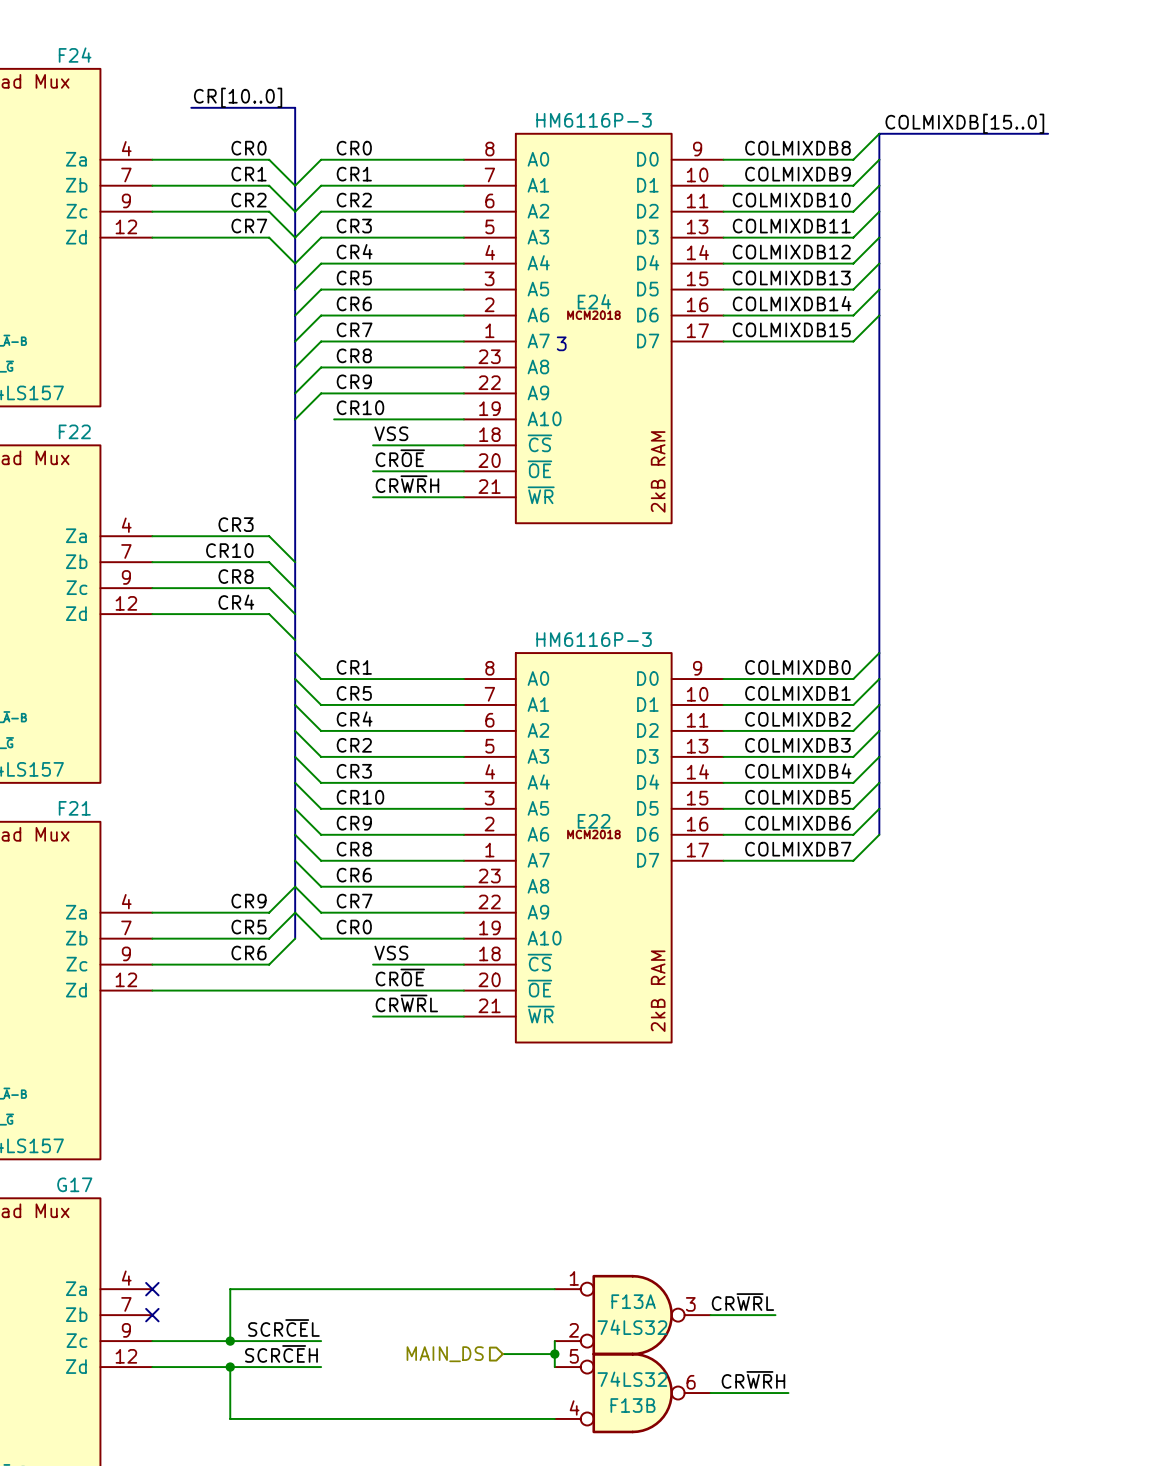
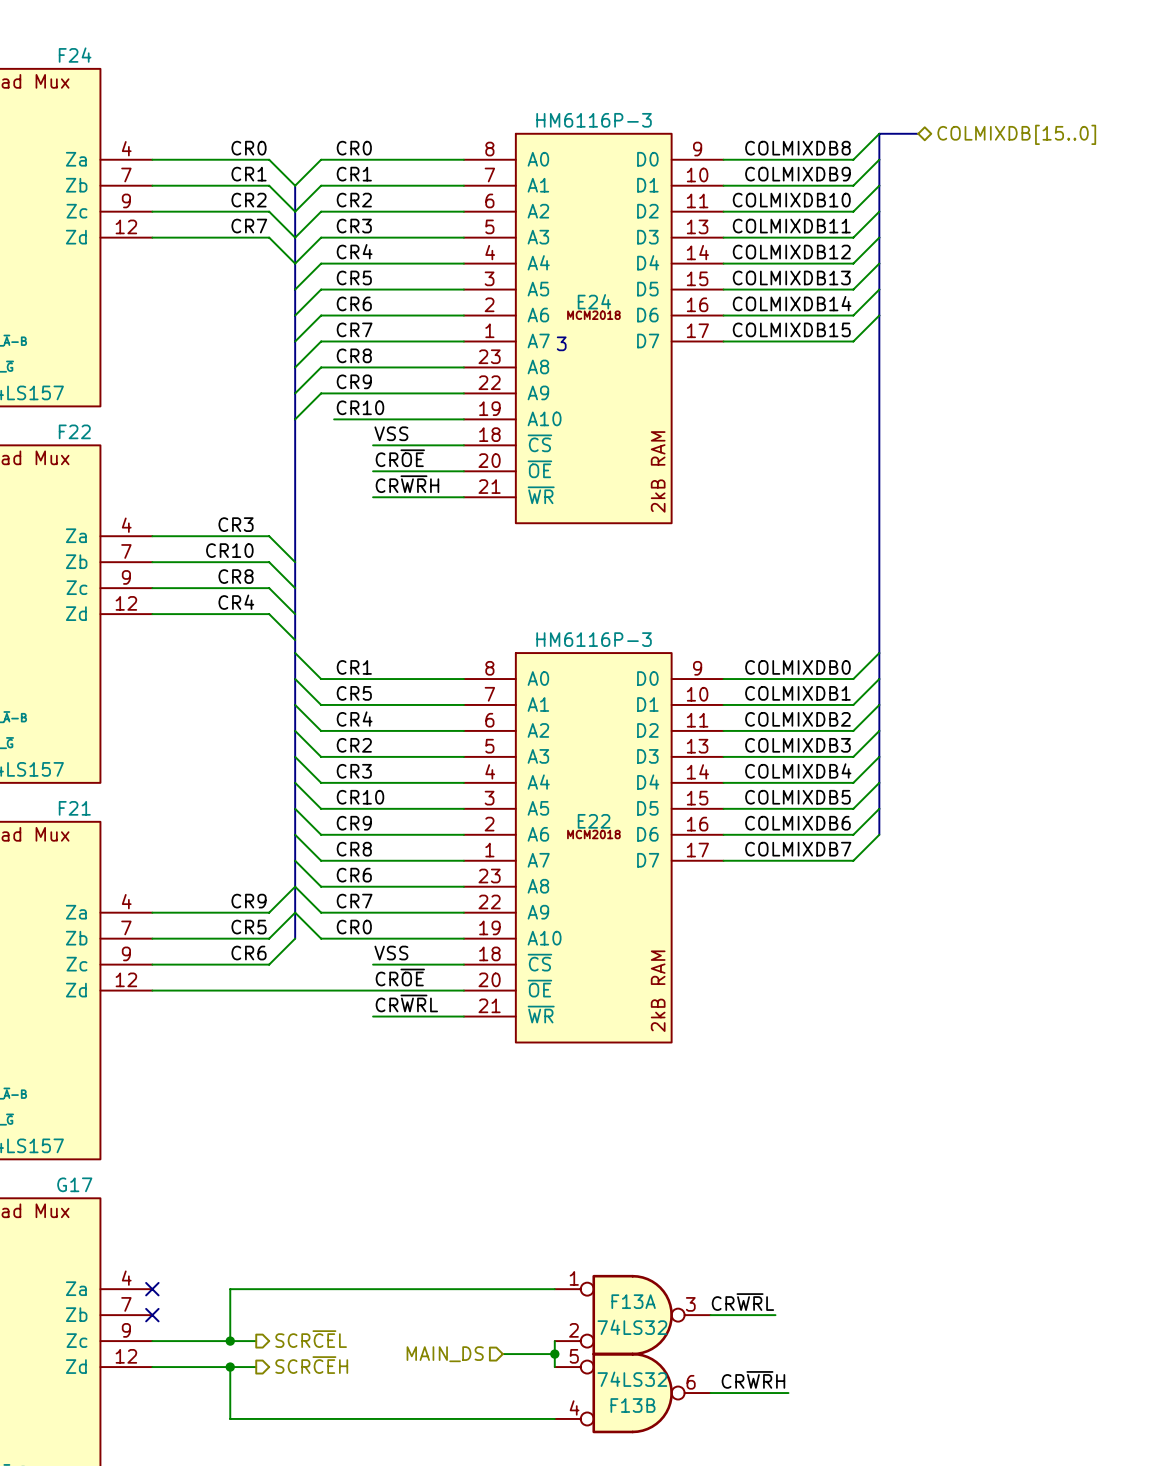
label: CR[10..0] (238, 97) -> none
bus: (191, 107) (295, 107) (295, 185) -> none
label: COLMIXDB[15..0] (964, 123) -> none
bus: (918, 133) (1048, 133) -> none
hierarchical label: none -> COLMIXDB[15..0] (1016, 134)
label: SCR~{CE}L (283, 1328) -> none
hierarchical label: none -> SCR~{CE}L (311, 1339)
wire: (256, 1341) (321, 1341) -> none
label: SCR~{CE}H (281, 1353) -> none
hierarchical label: none -> SCR~{CE}H (311, 1365)
wire: (256, 1367) (321, 1367) -> none

